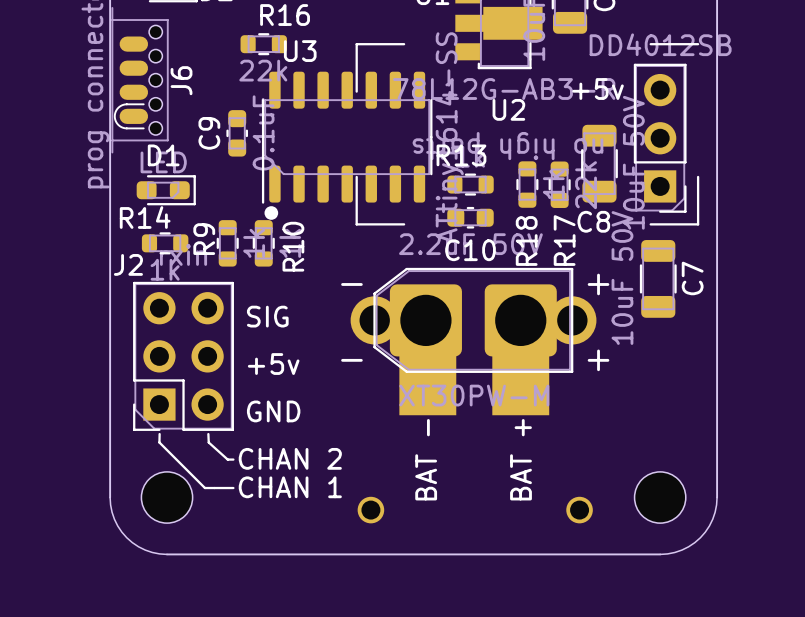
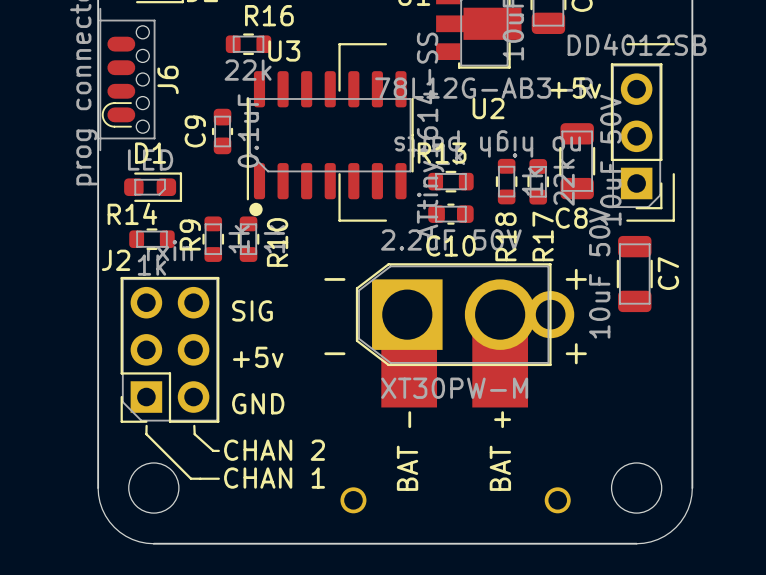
part footprint: [350, 267, 597, 524] -> [340, 263, 575, 514]

